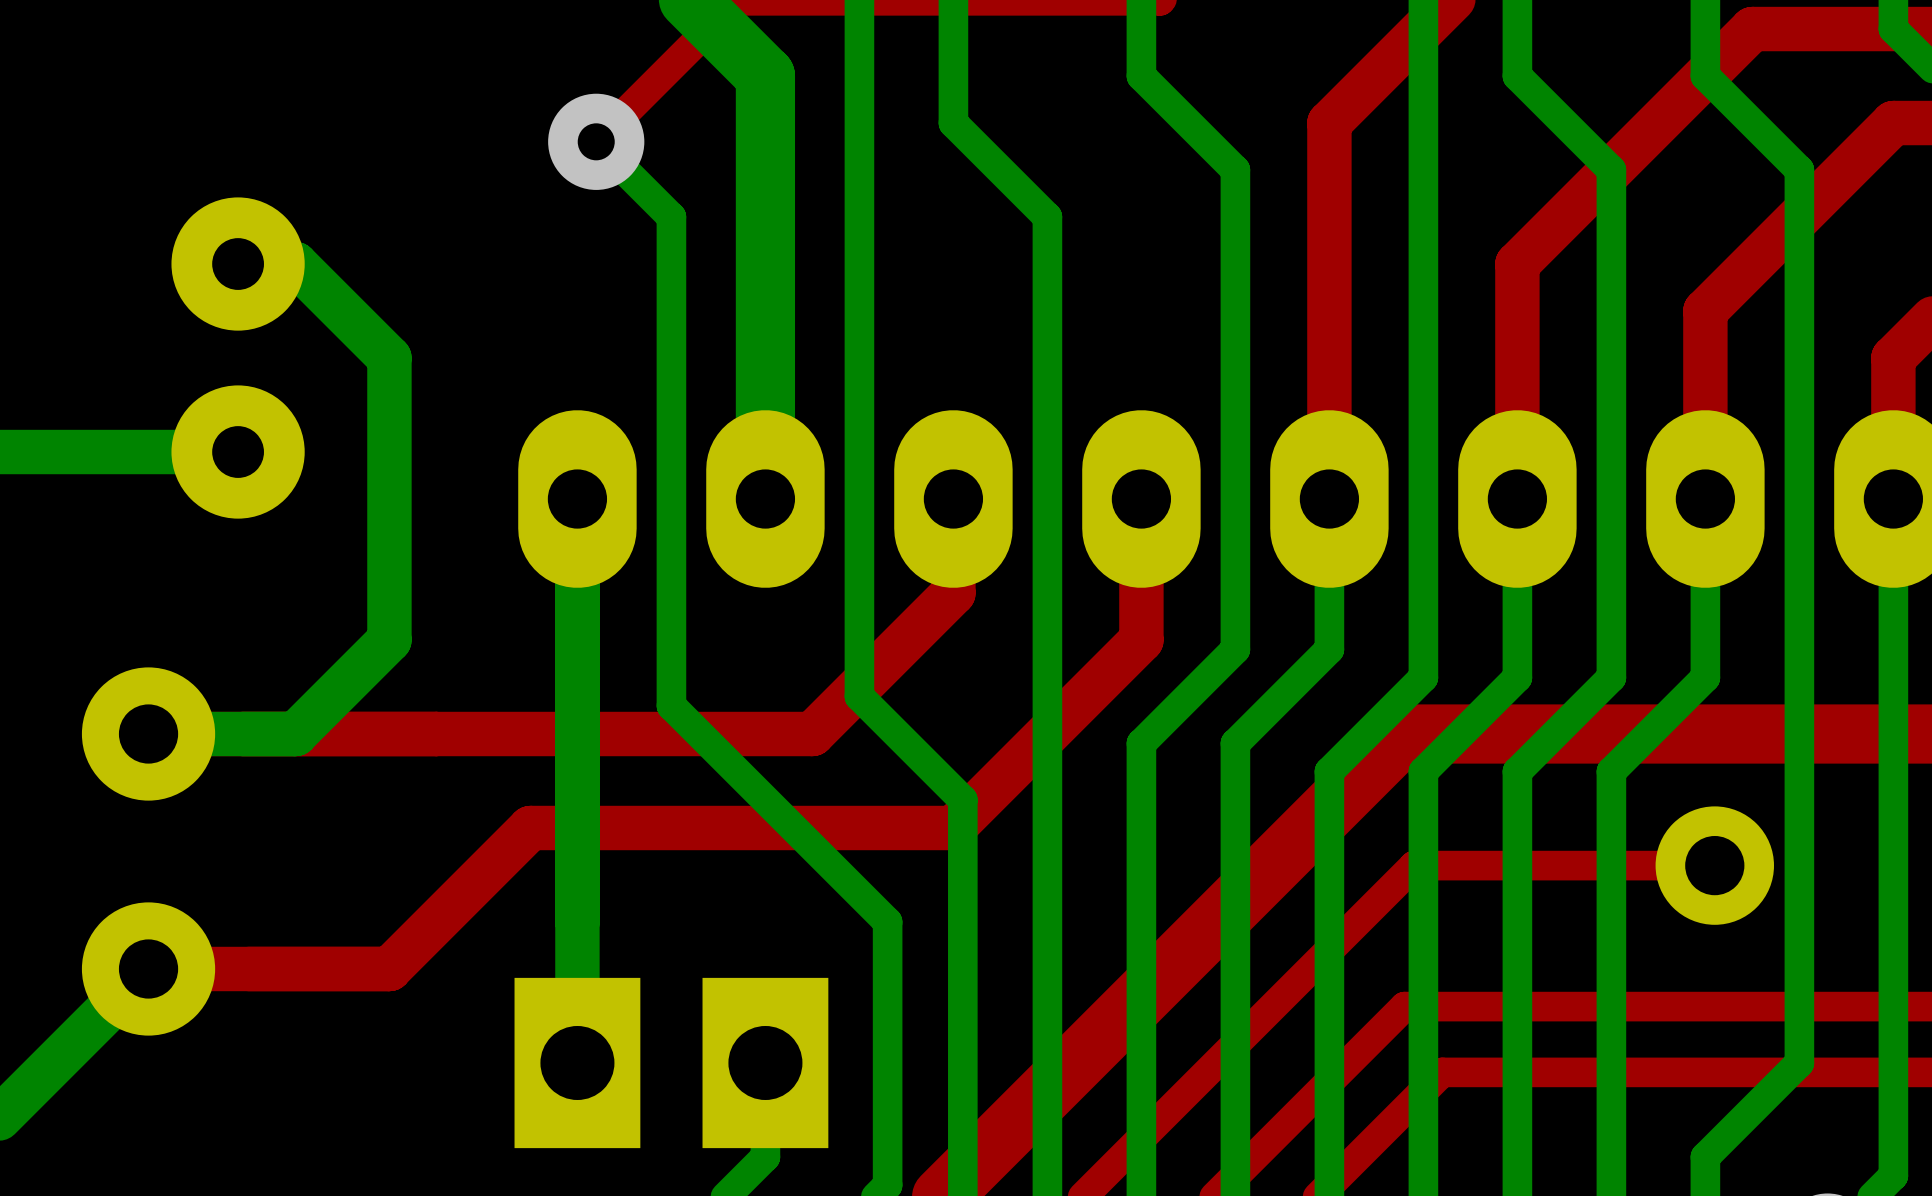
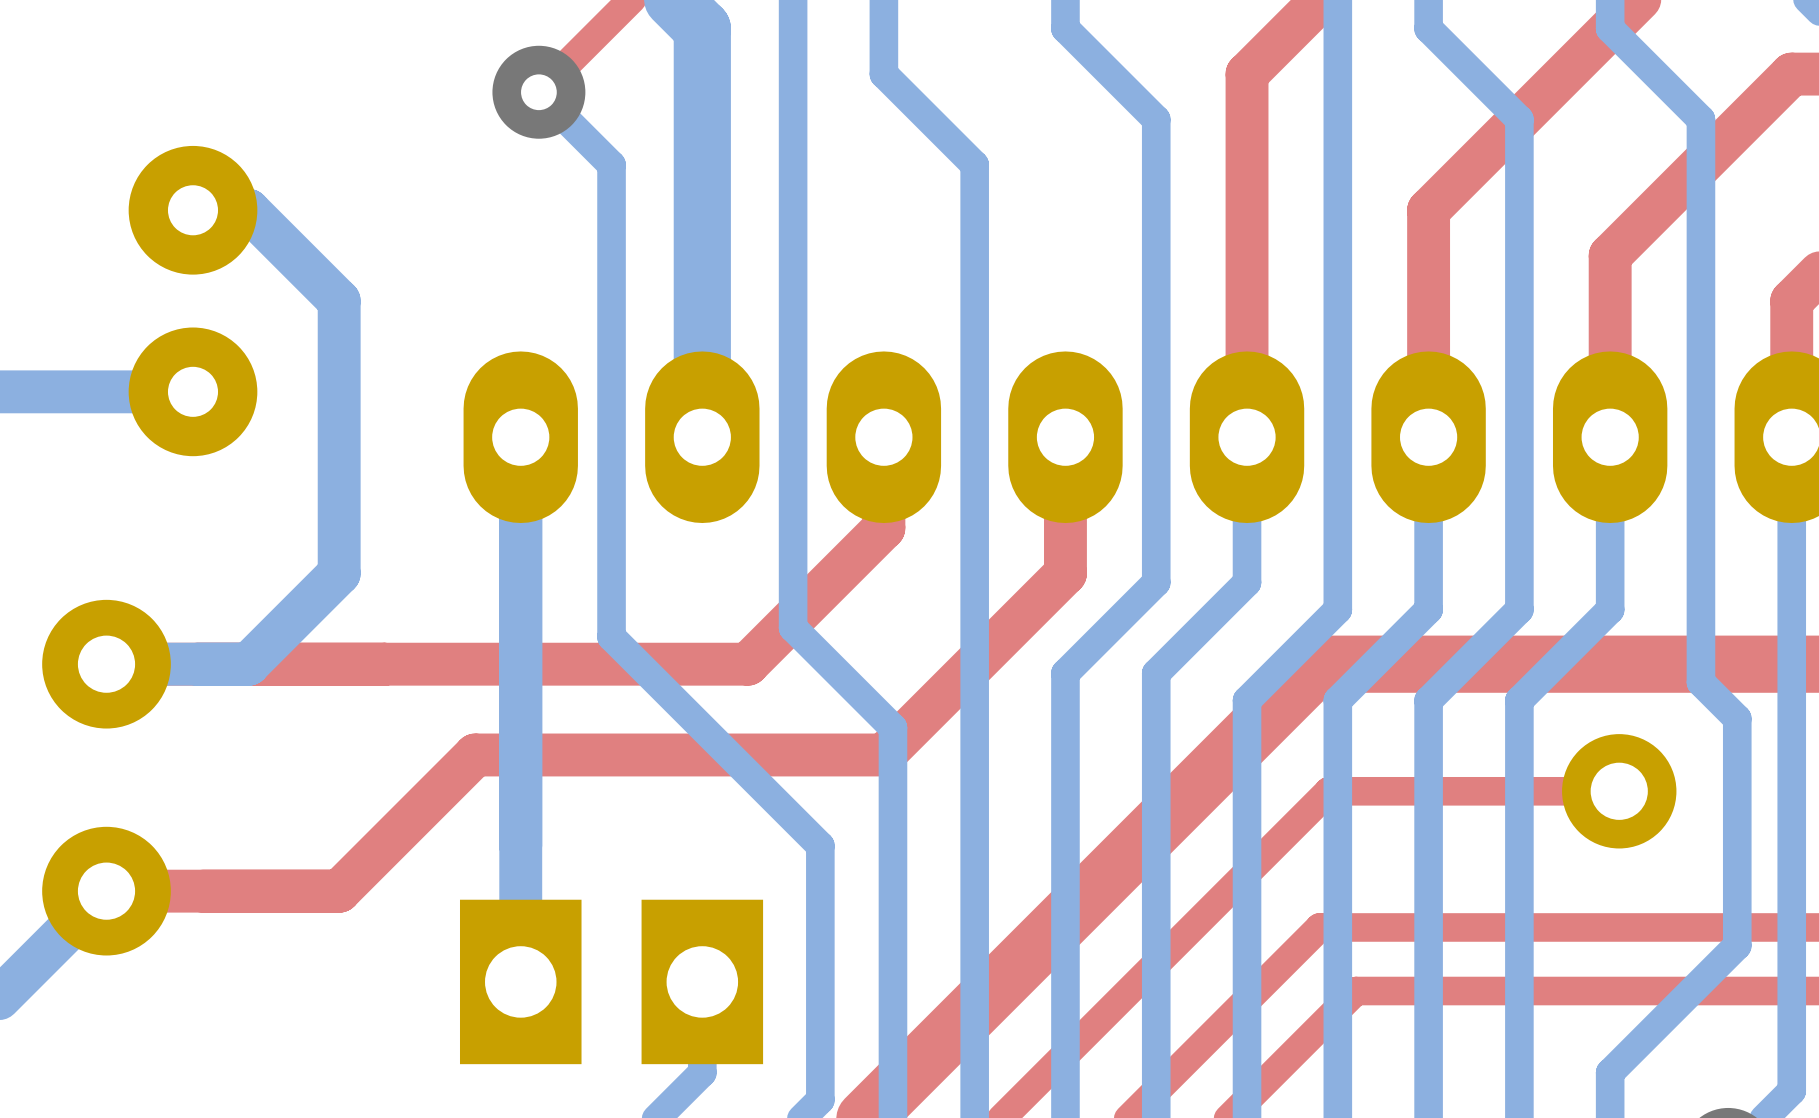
bottom track: (1799, 752) (1799, 1062) -> (1700, 682) (1737, 718) (1737, 945) (1700, 981)

